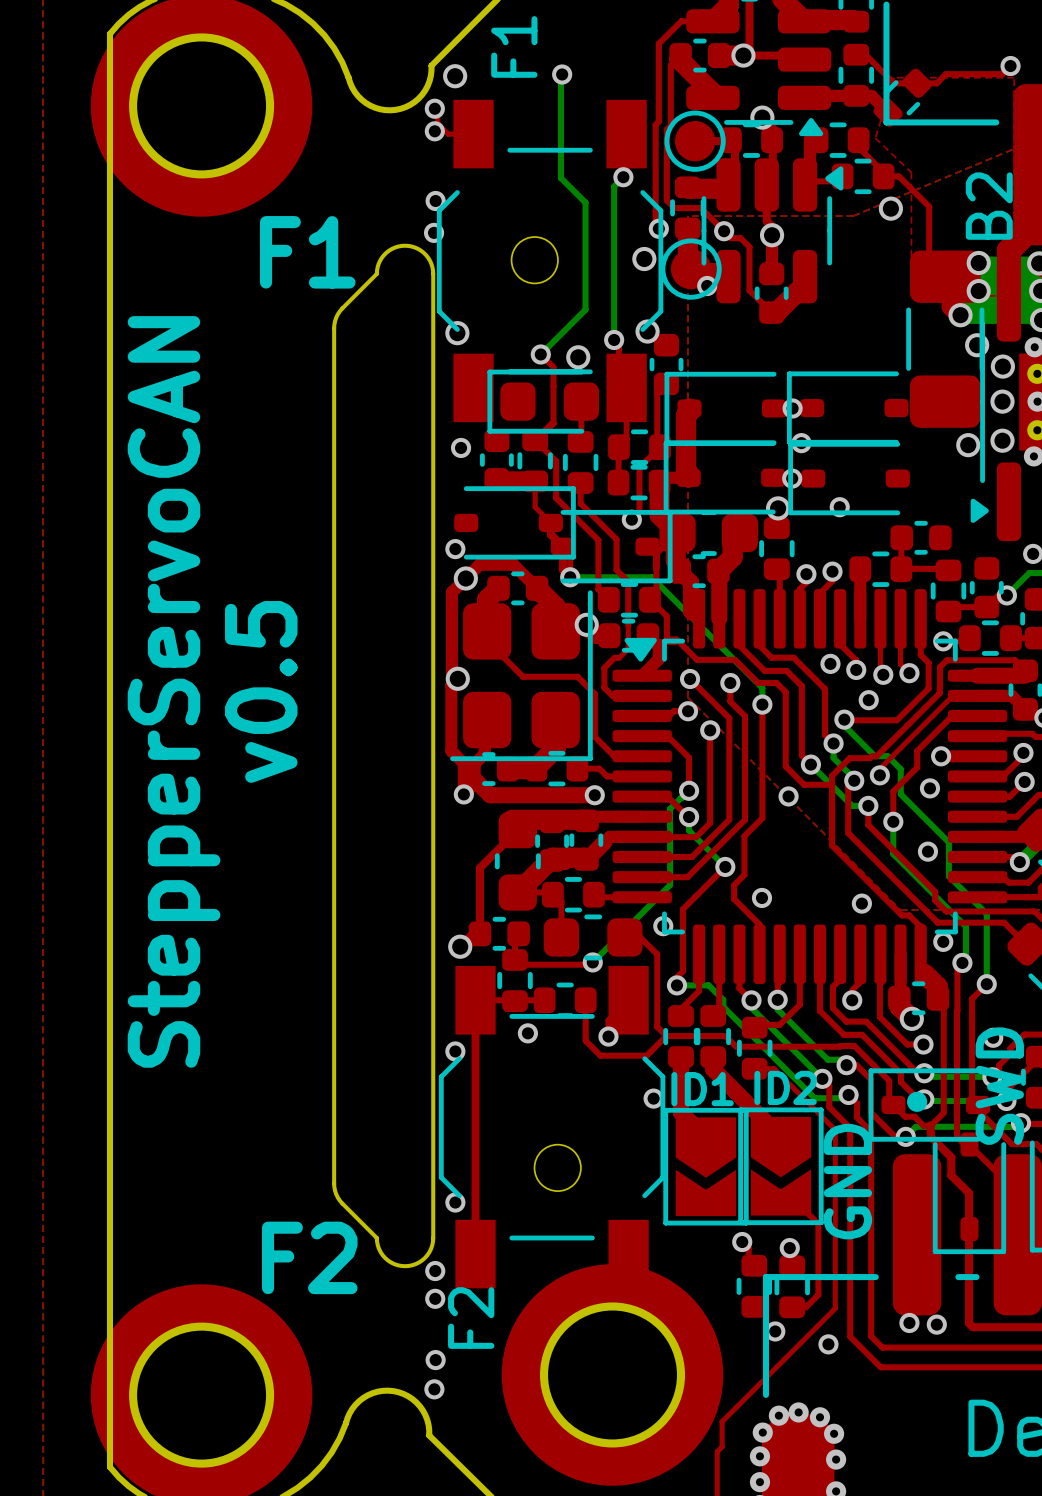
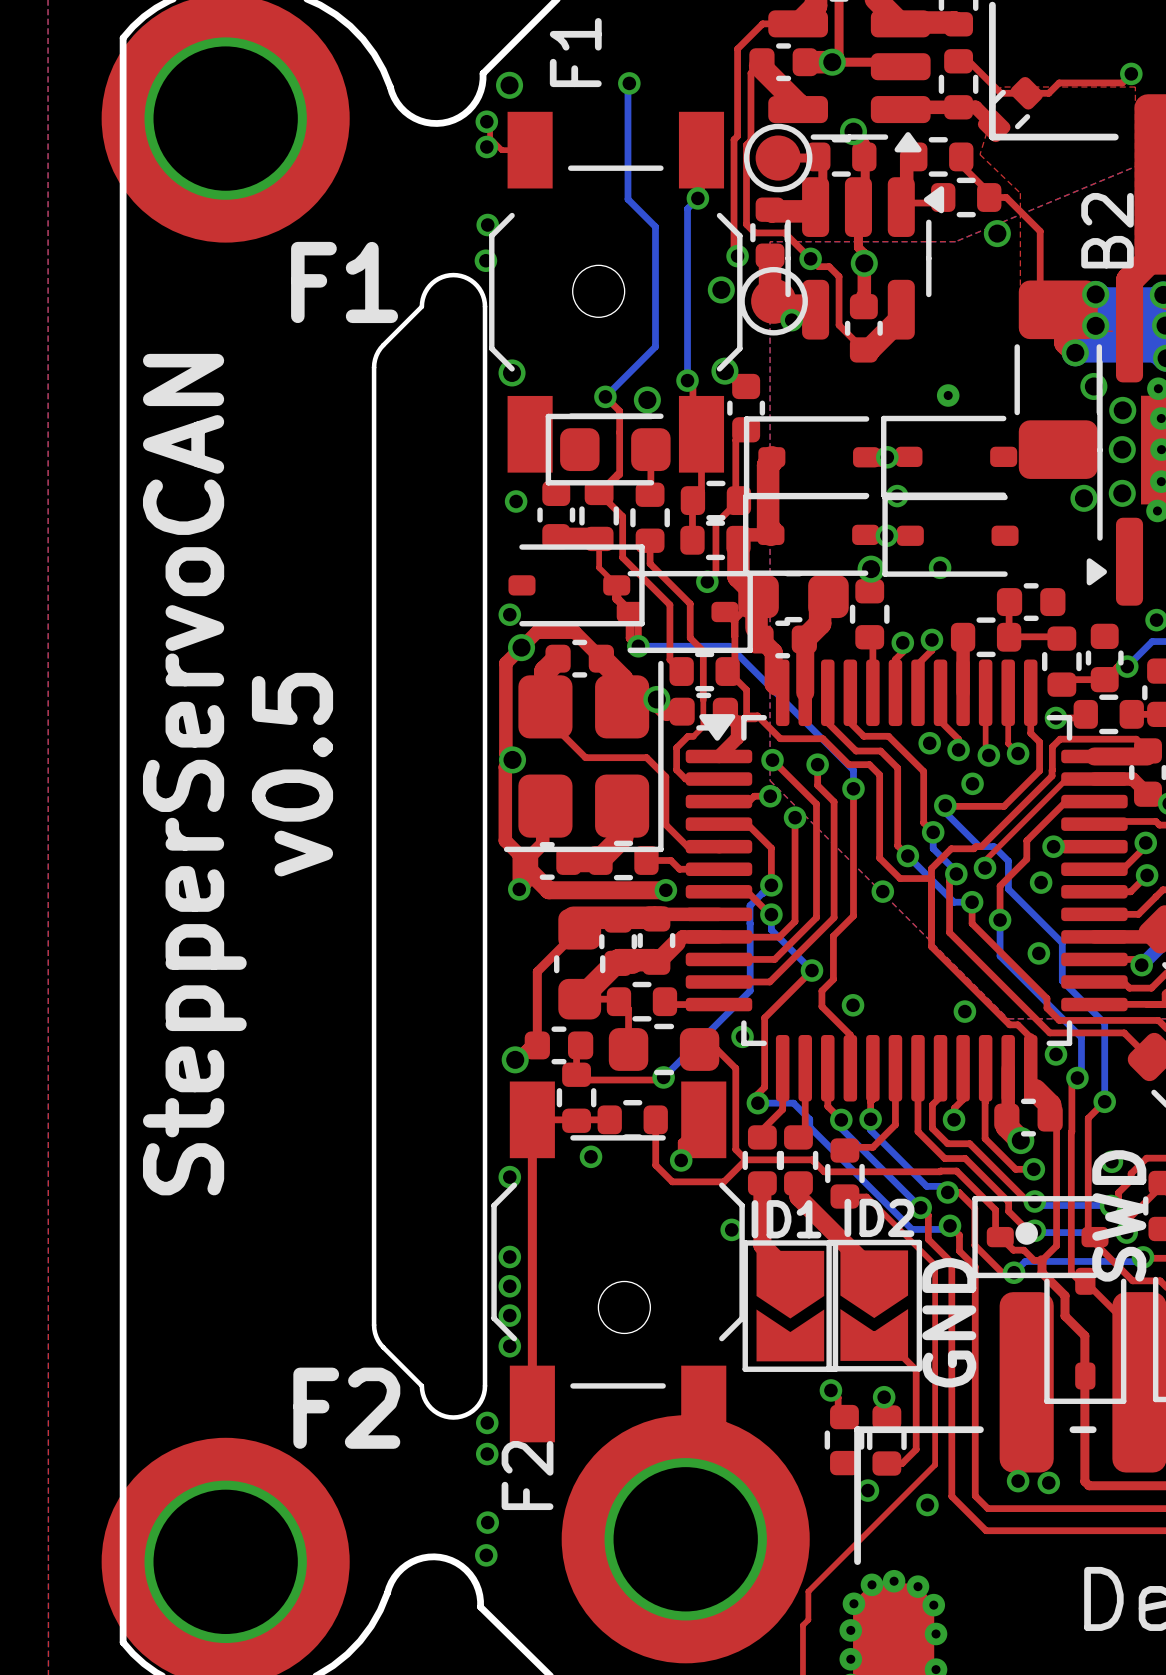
via: none -> (948, 395)
via: none -> (509, 1256)
via: none -> (509, 1286)
via: none -> (509, 1315)

